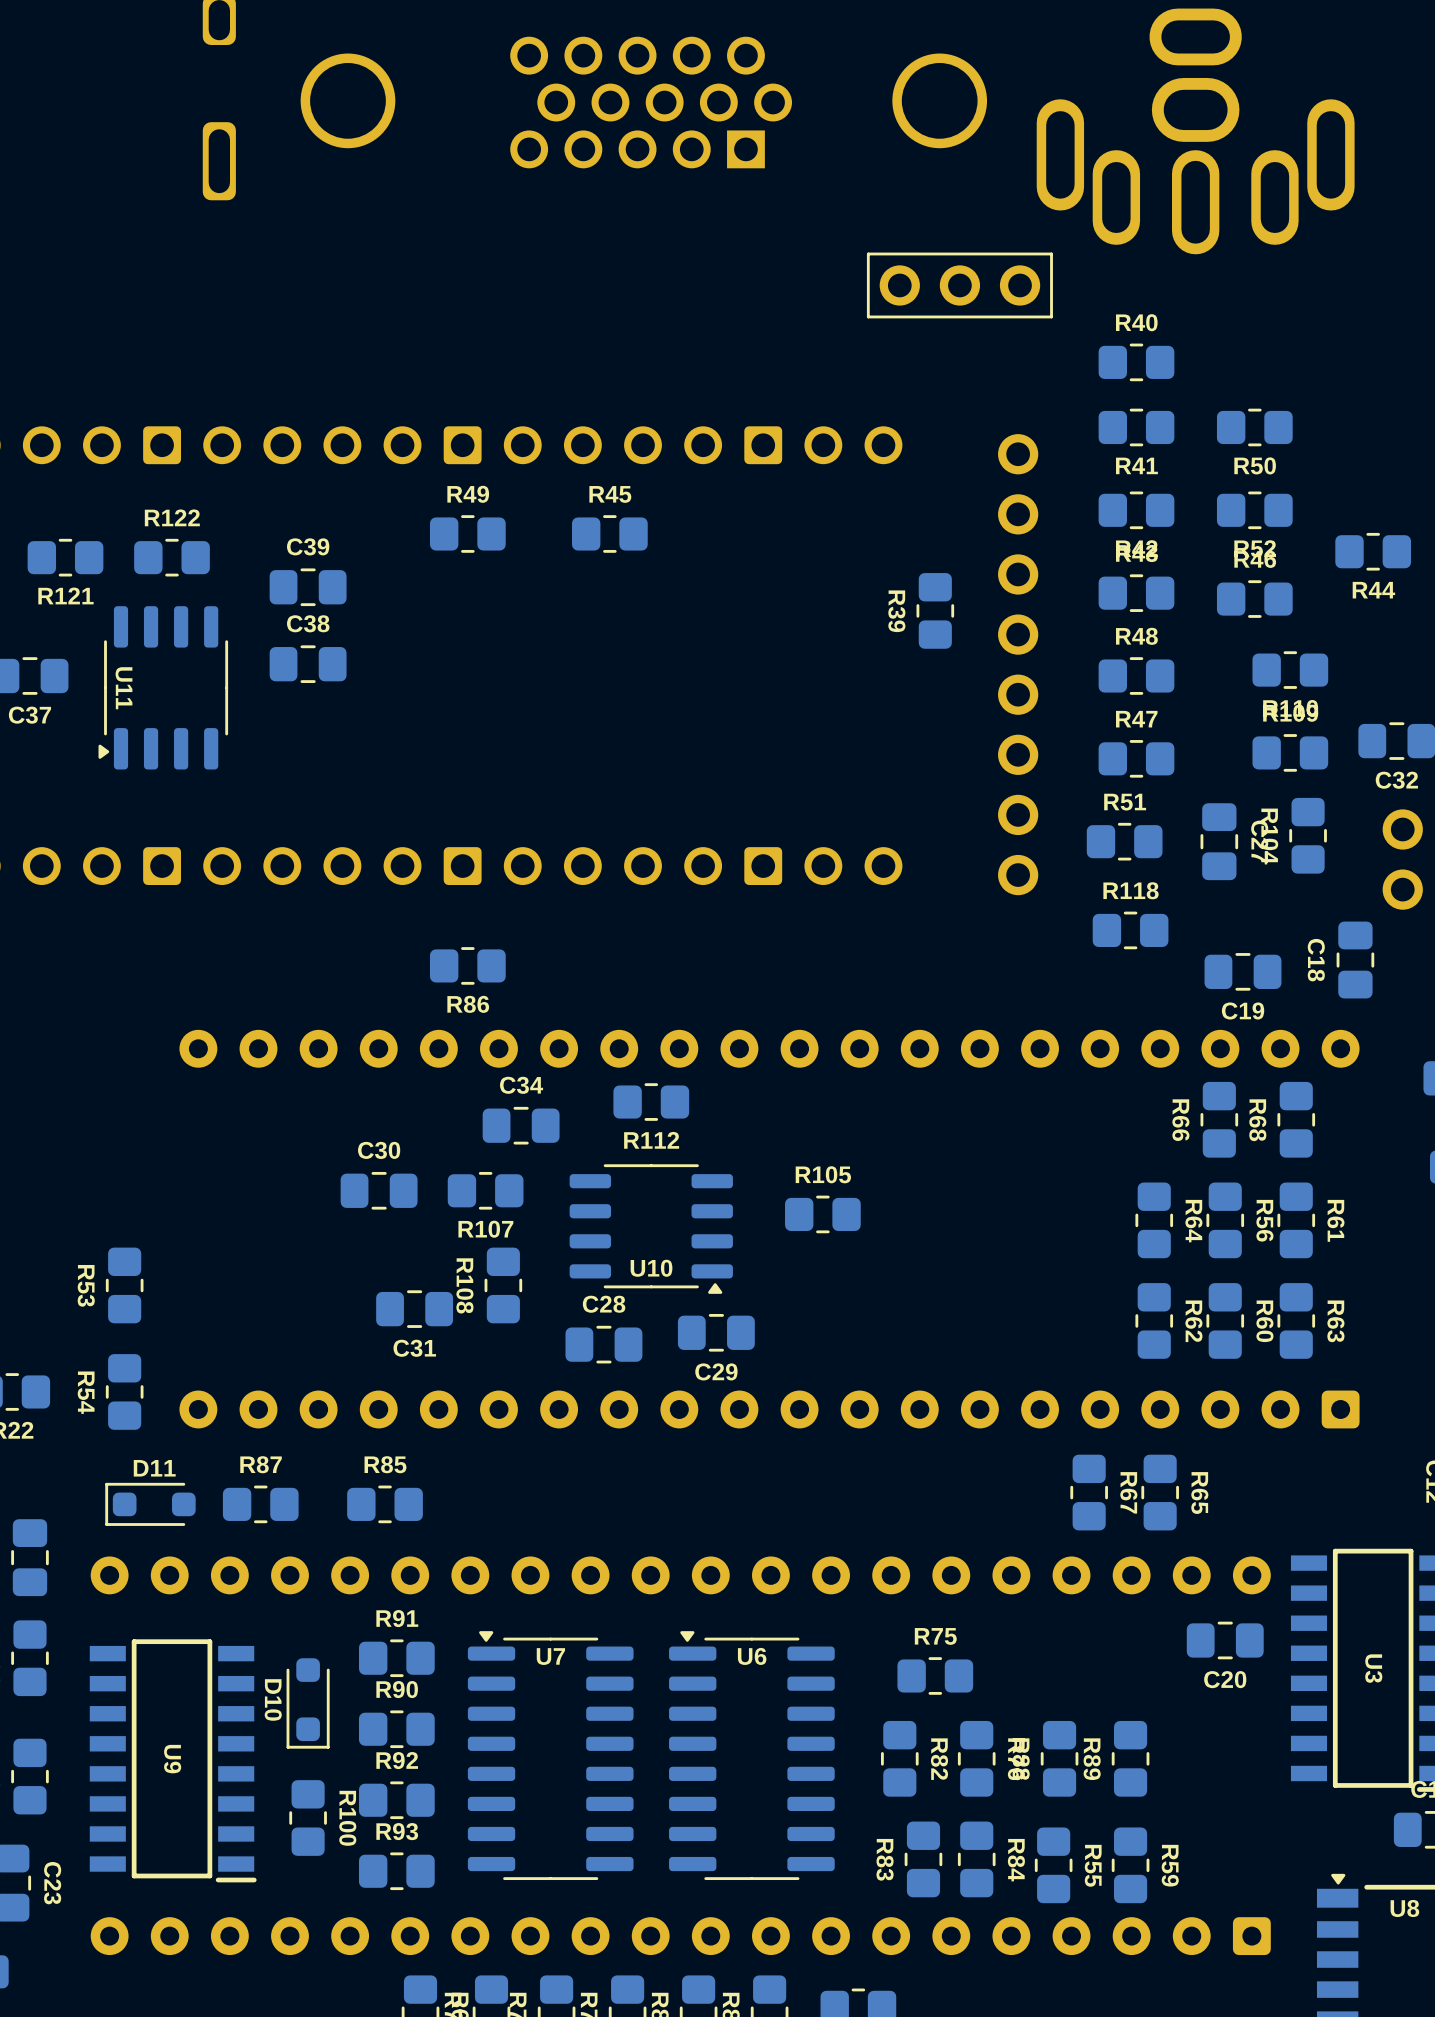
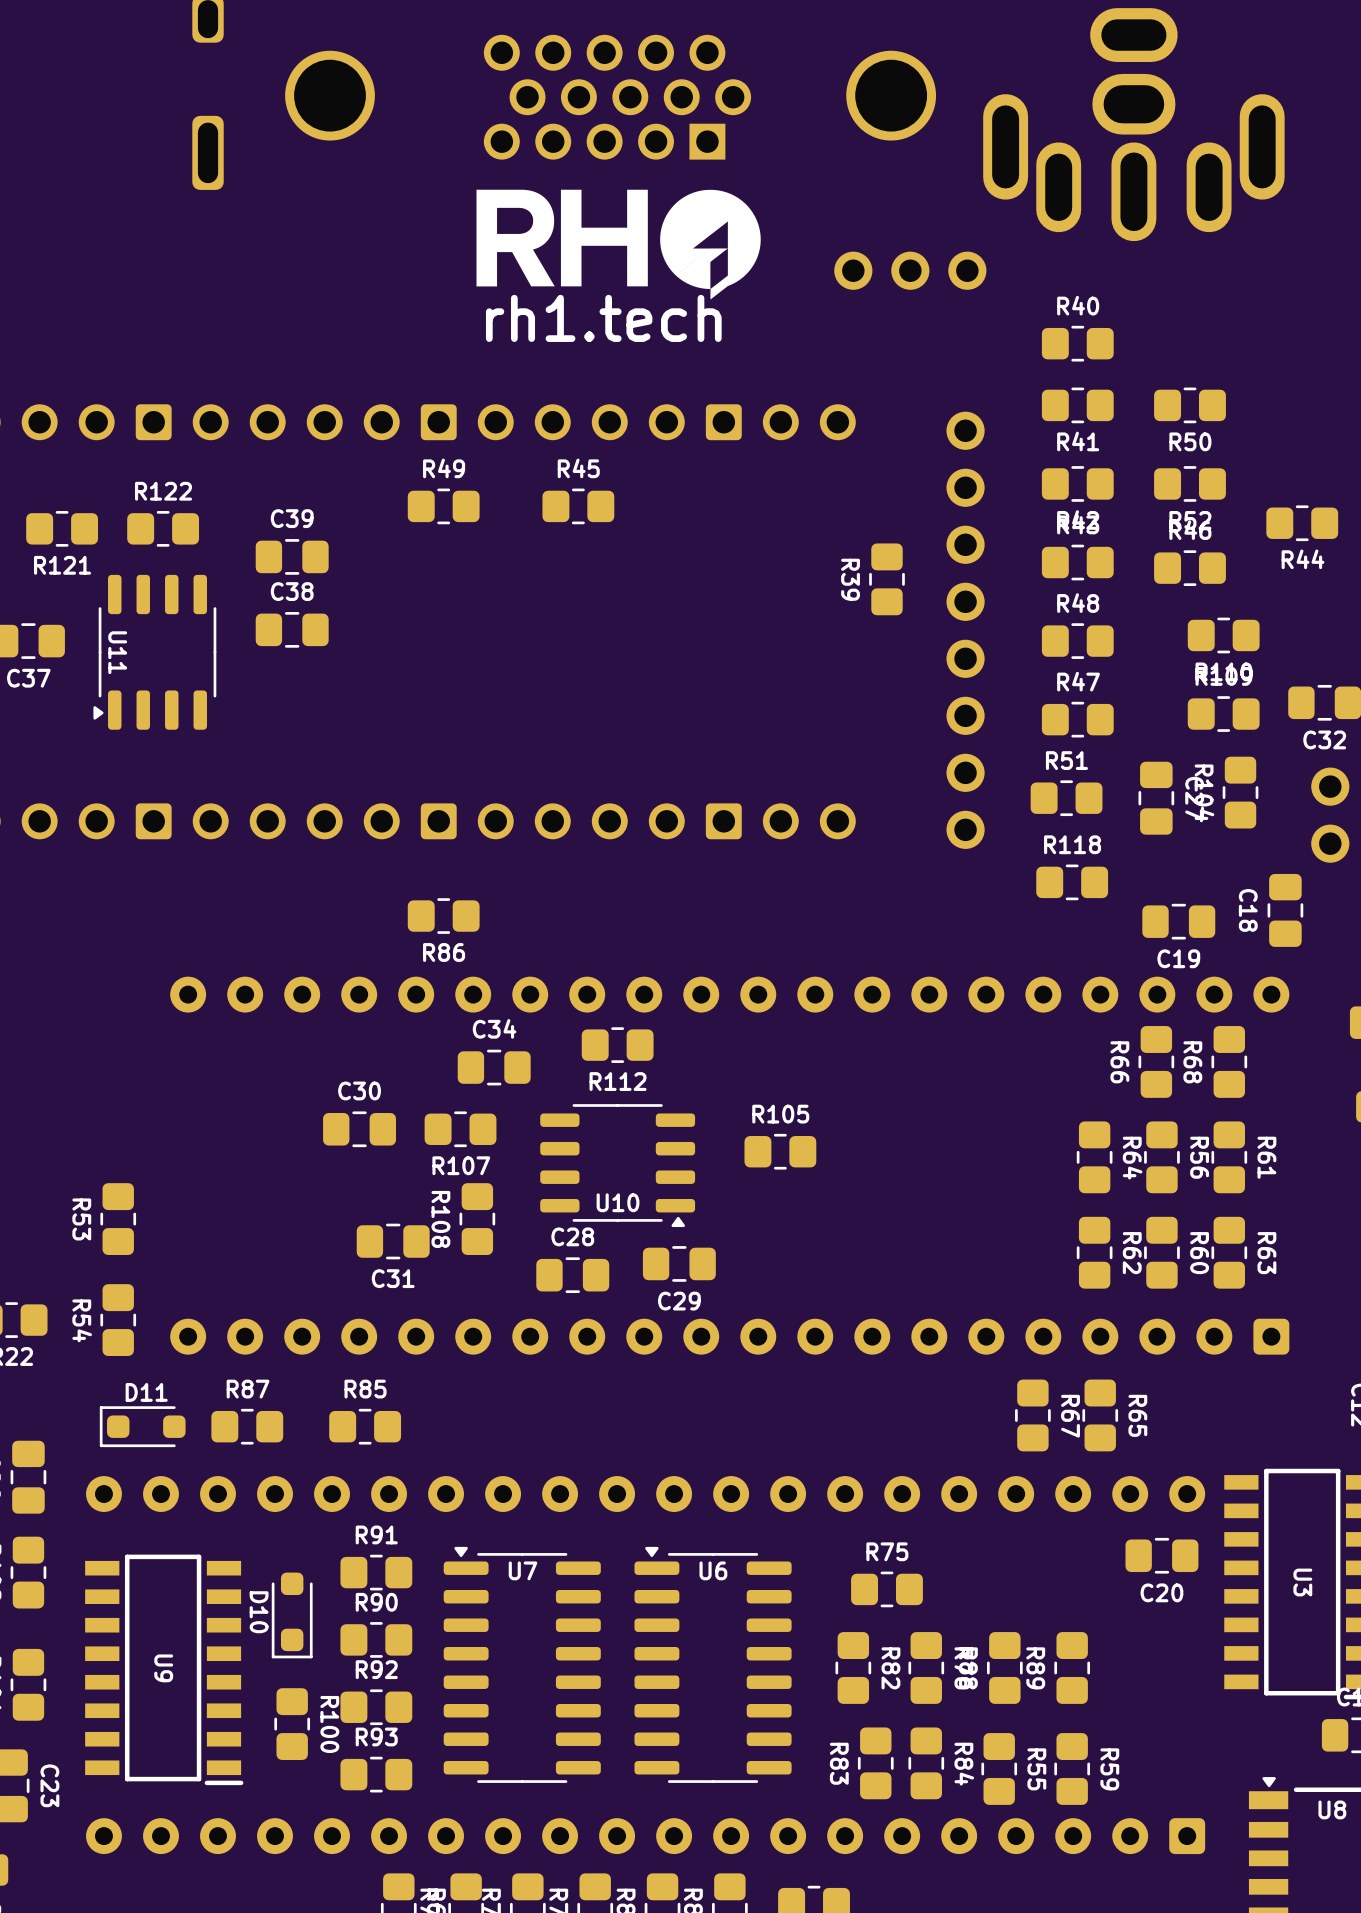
drawing: none -> [476, 189, 761, 300]
part footprint: [866, 252, 1053, 319] -> [834, 251, 987, 290]
text: none -> rh1.tech (603, 318)

